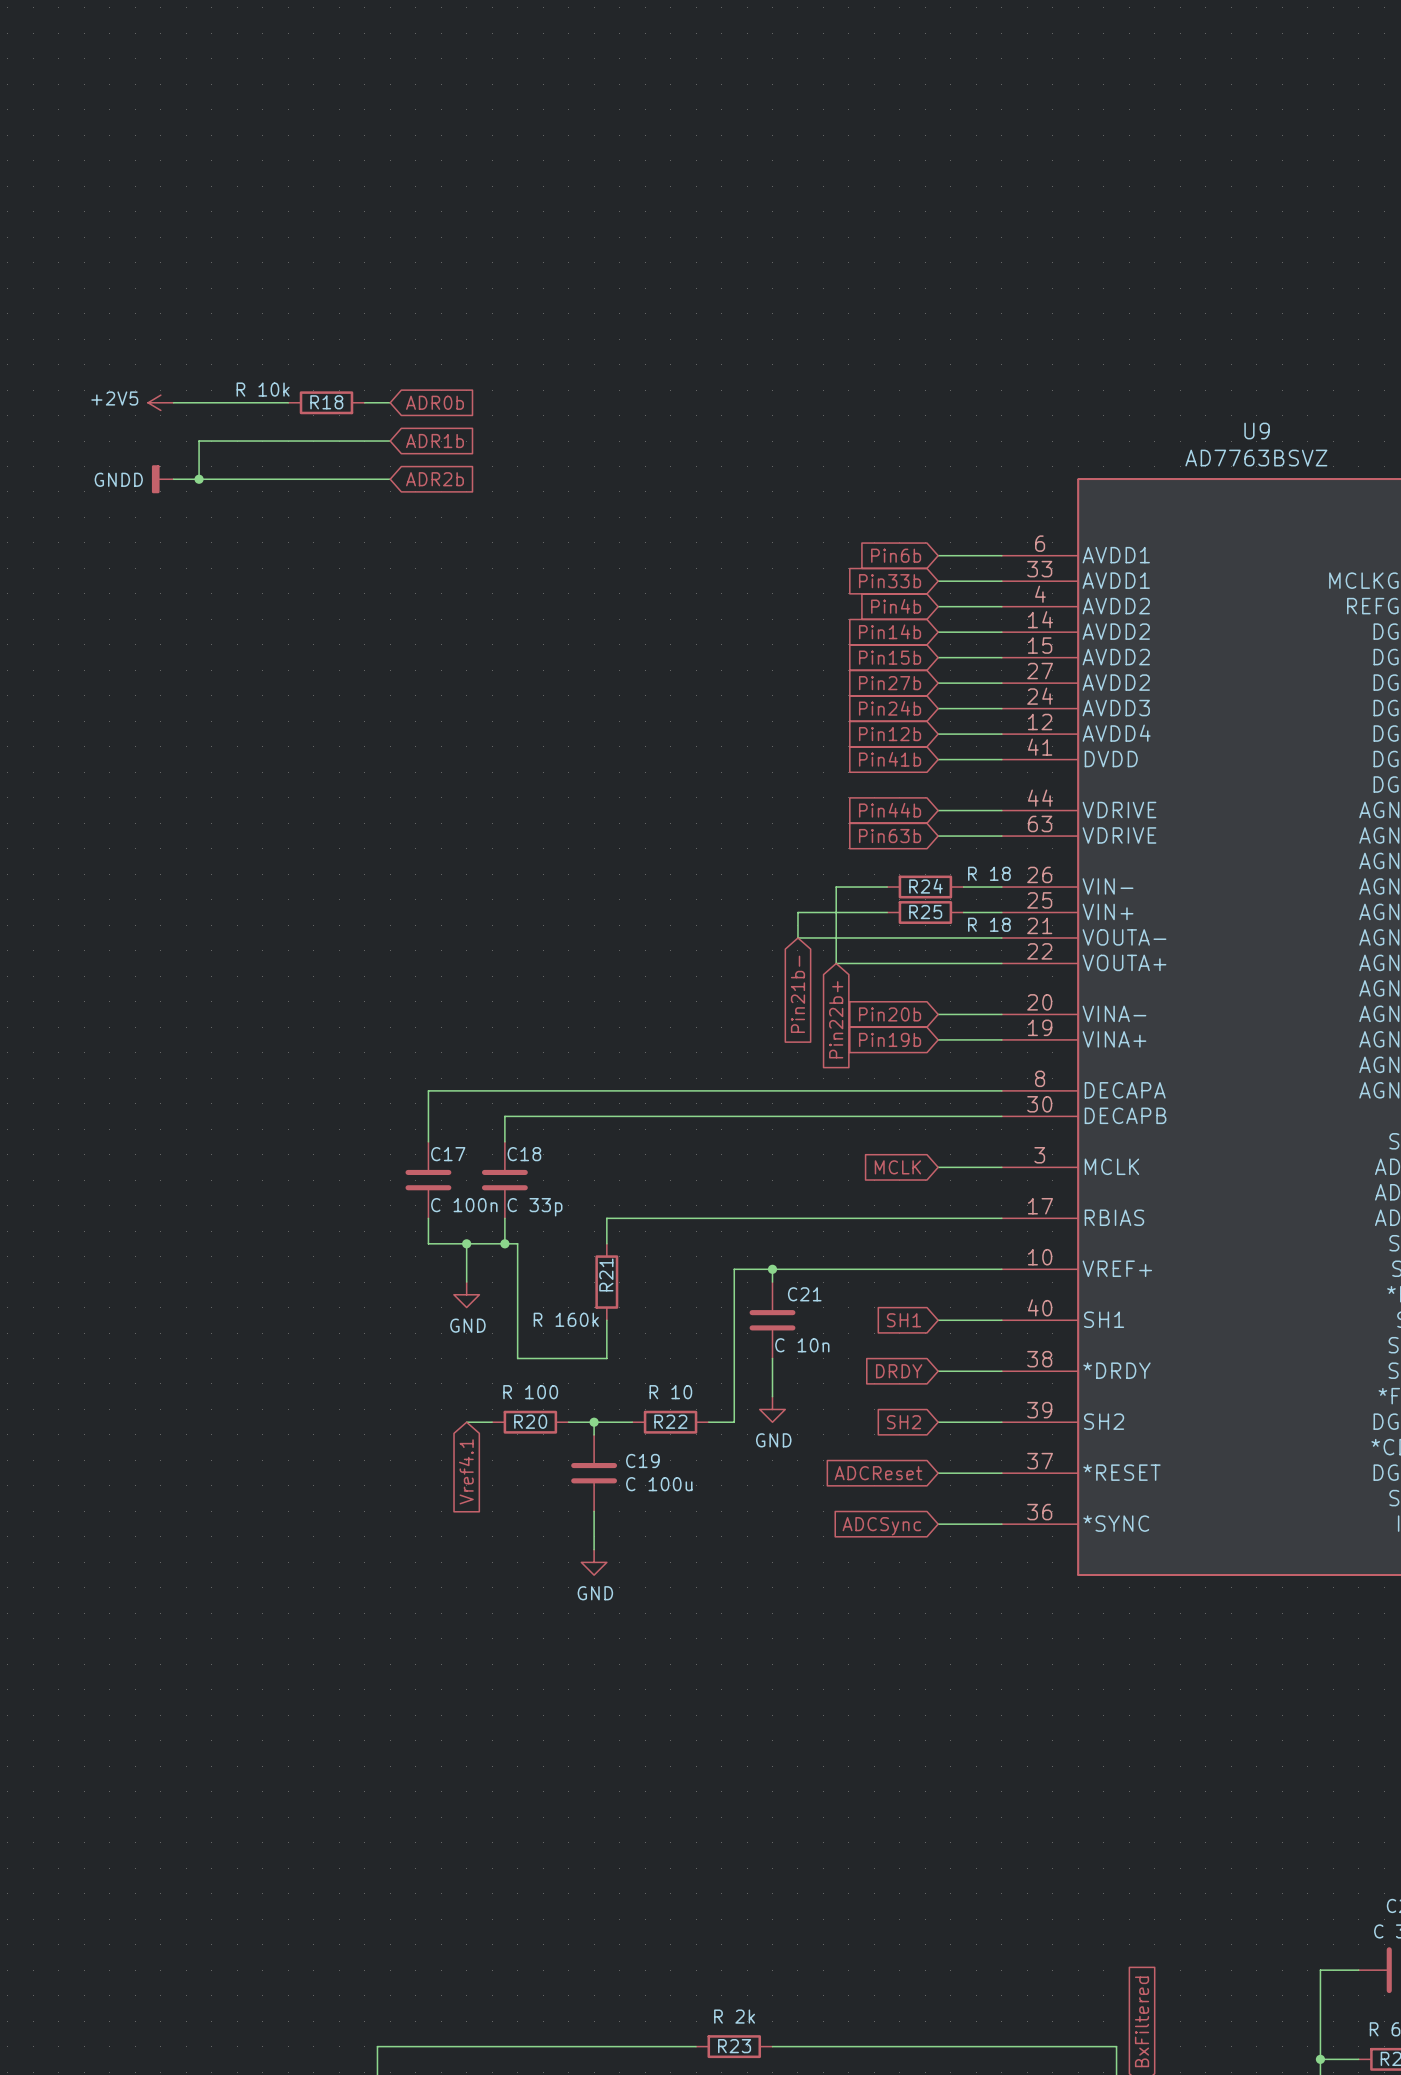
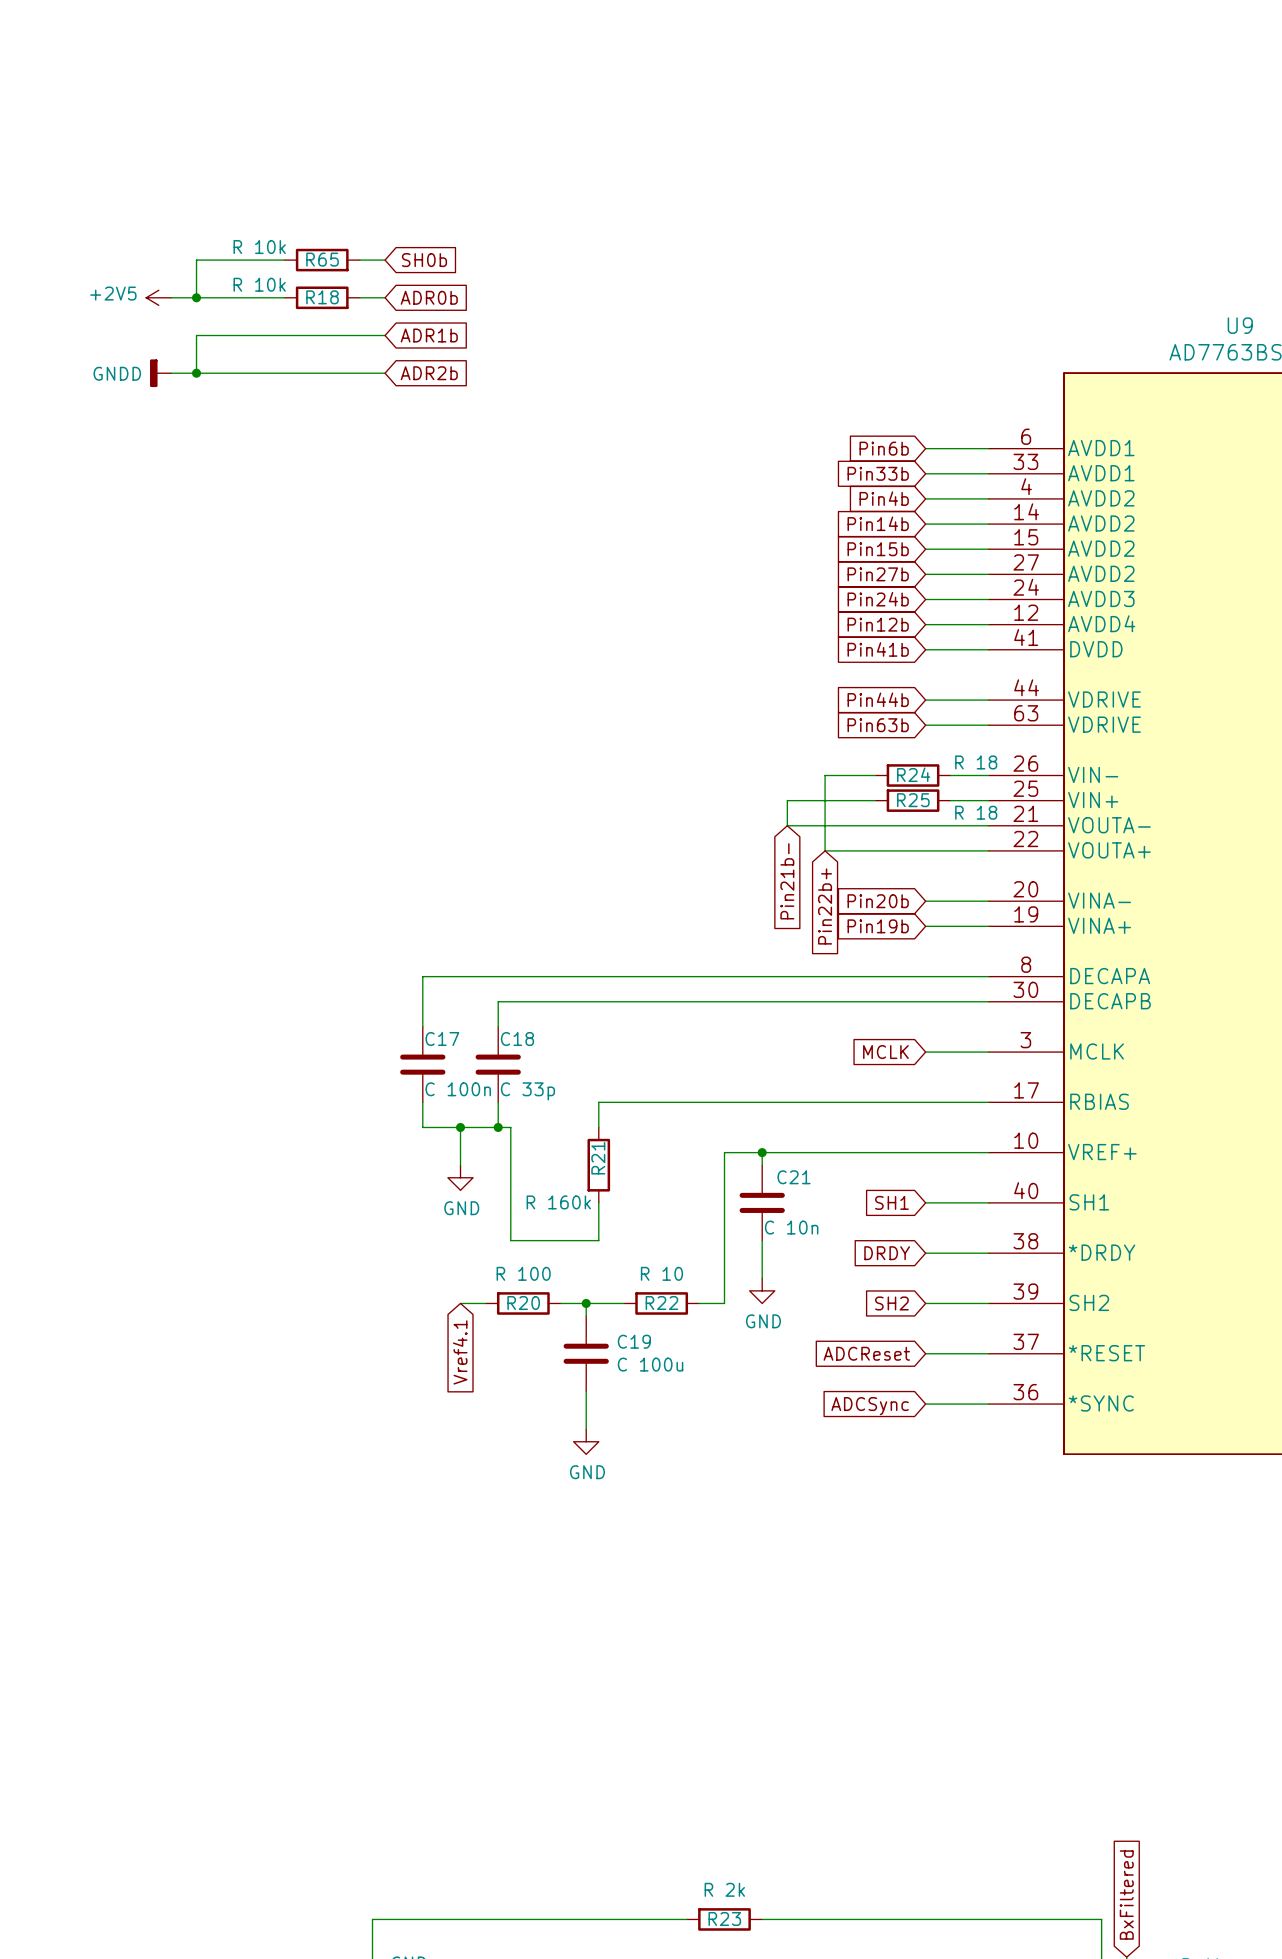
wire: none -> (284, 260) (196, 260) (196, 297)
R65: none -> R 10k (322, 260)
wire: none -> (359, 260) (385, 260)
global label: none -> SH0b (424, 260)
junction: none -> (196, 297)

